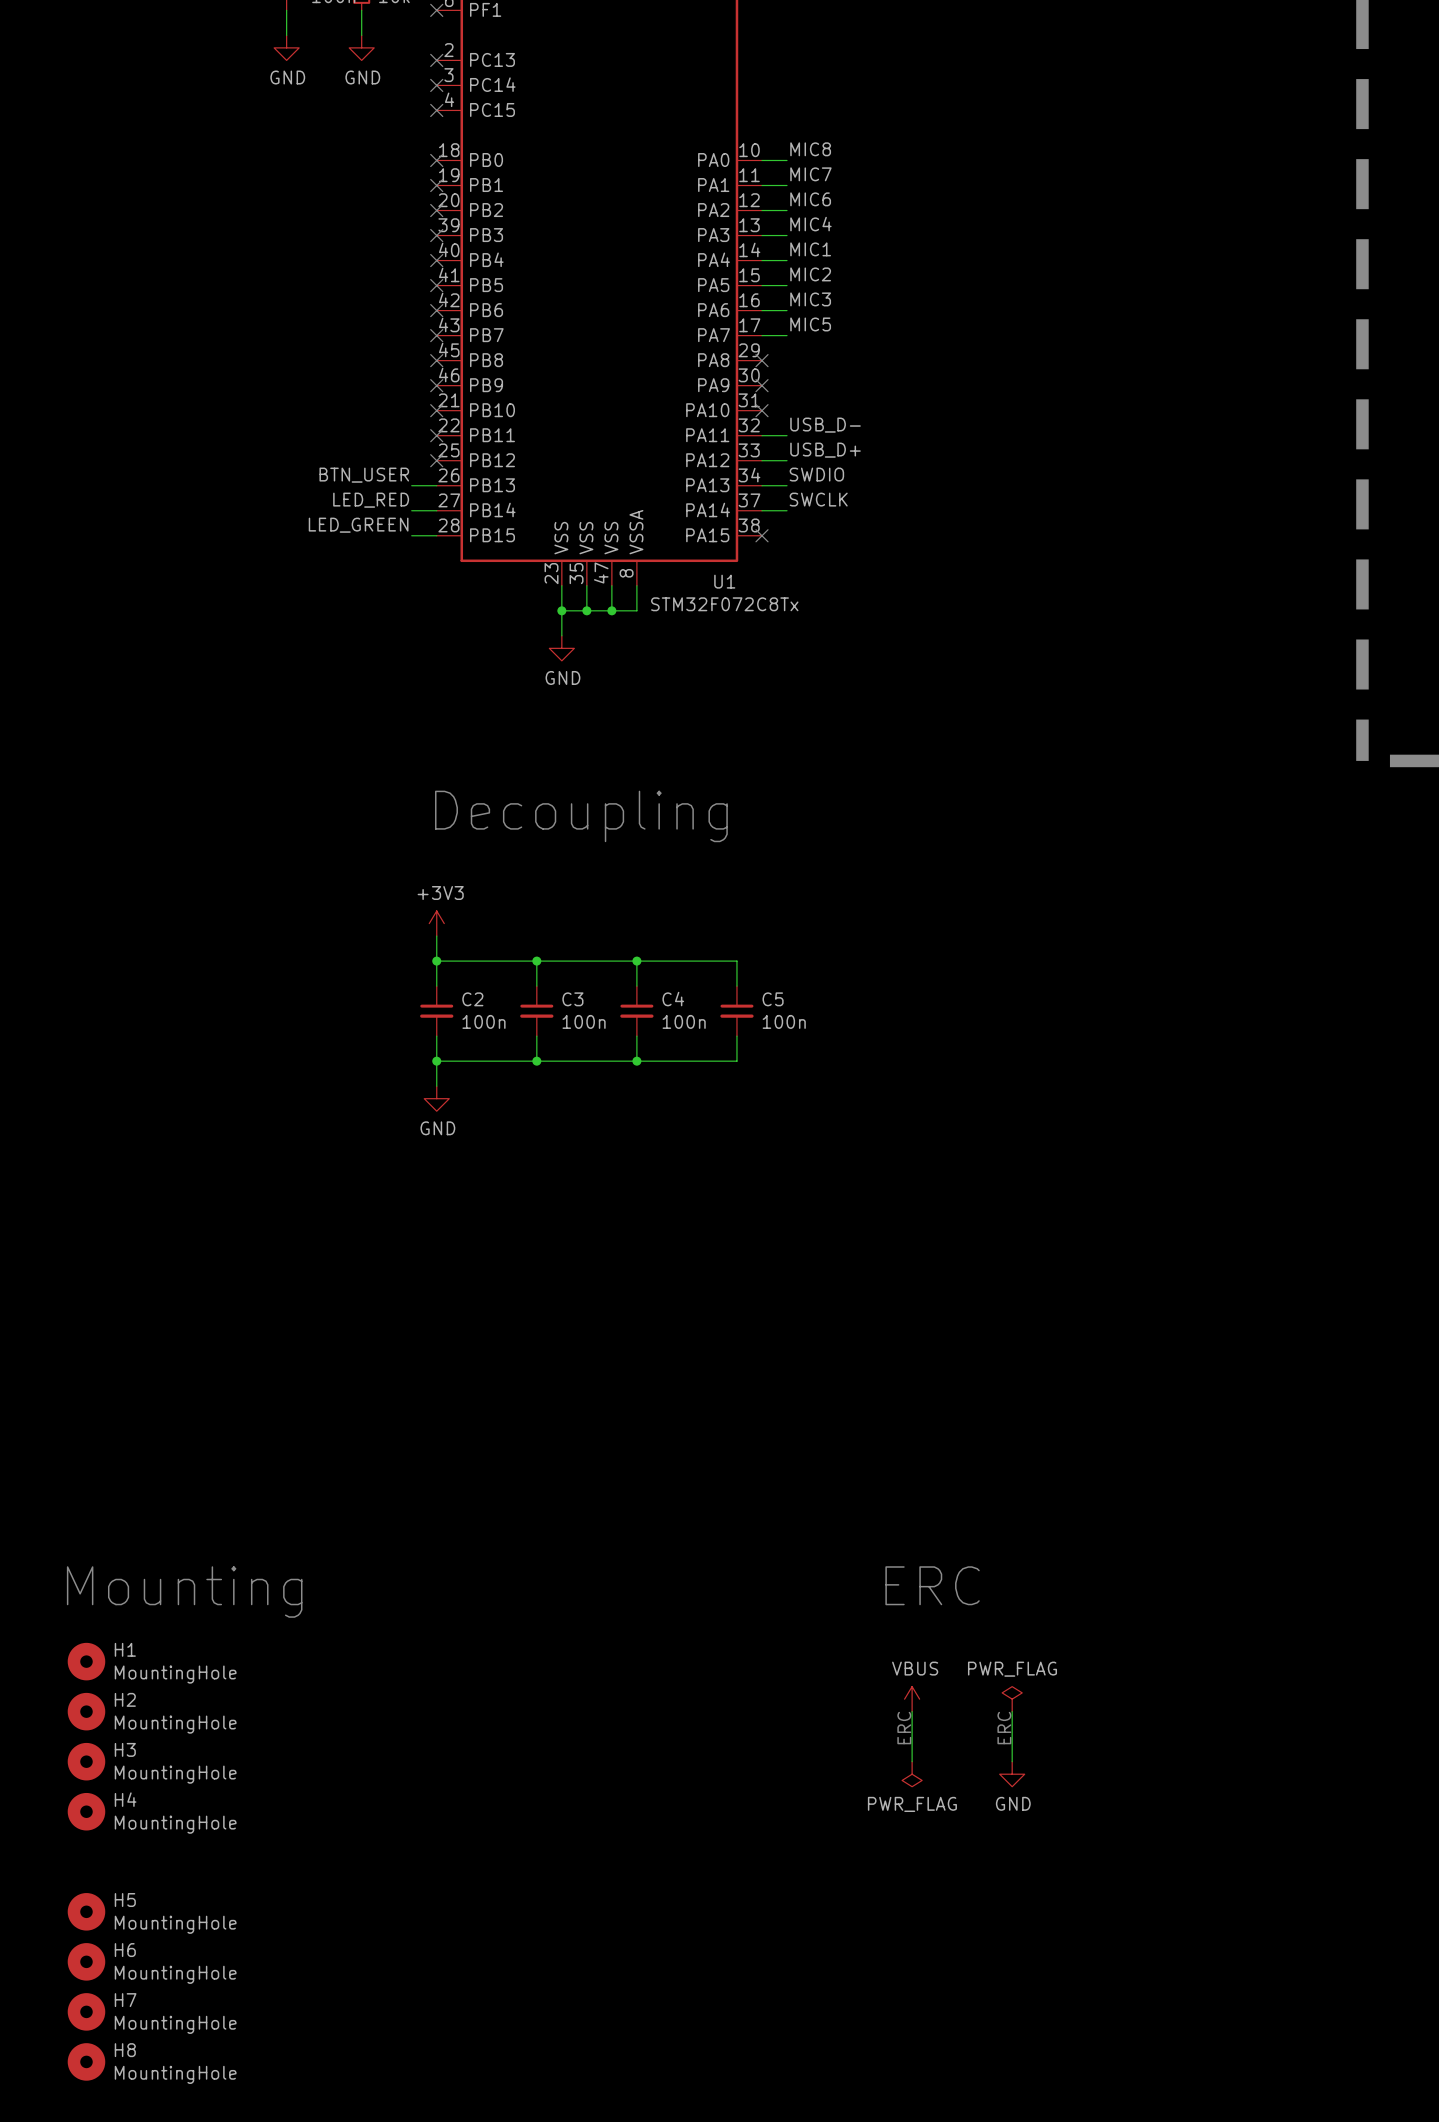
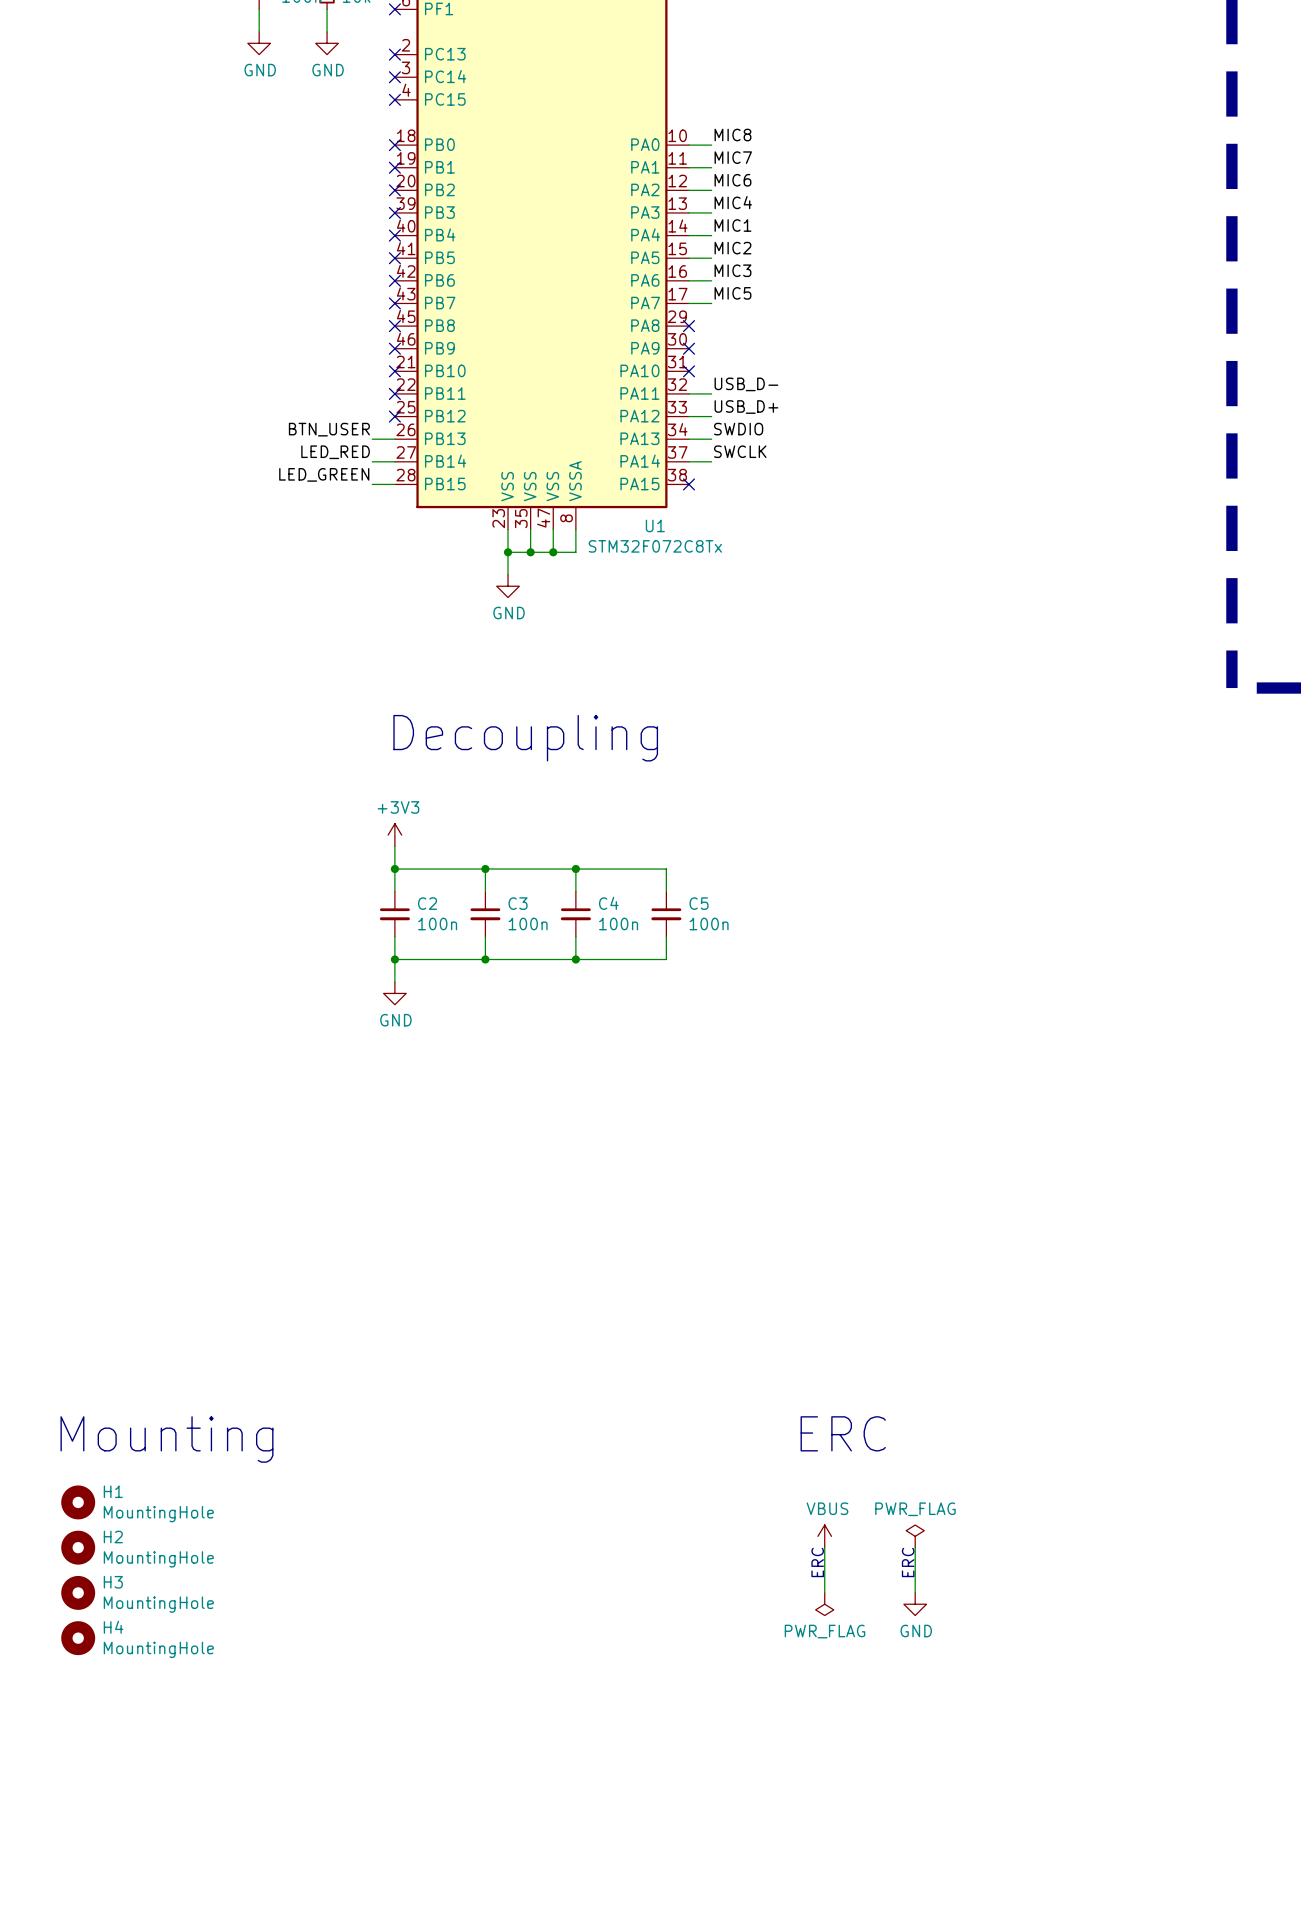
H5: MountingHole (86, 1911) -> none
H6: MountingHole (86, 1961) -> none
H7: MountingHole (86, 2011) -> none
H8: MountingHole (86, 2061) -> none

